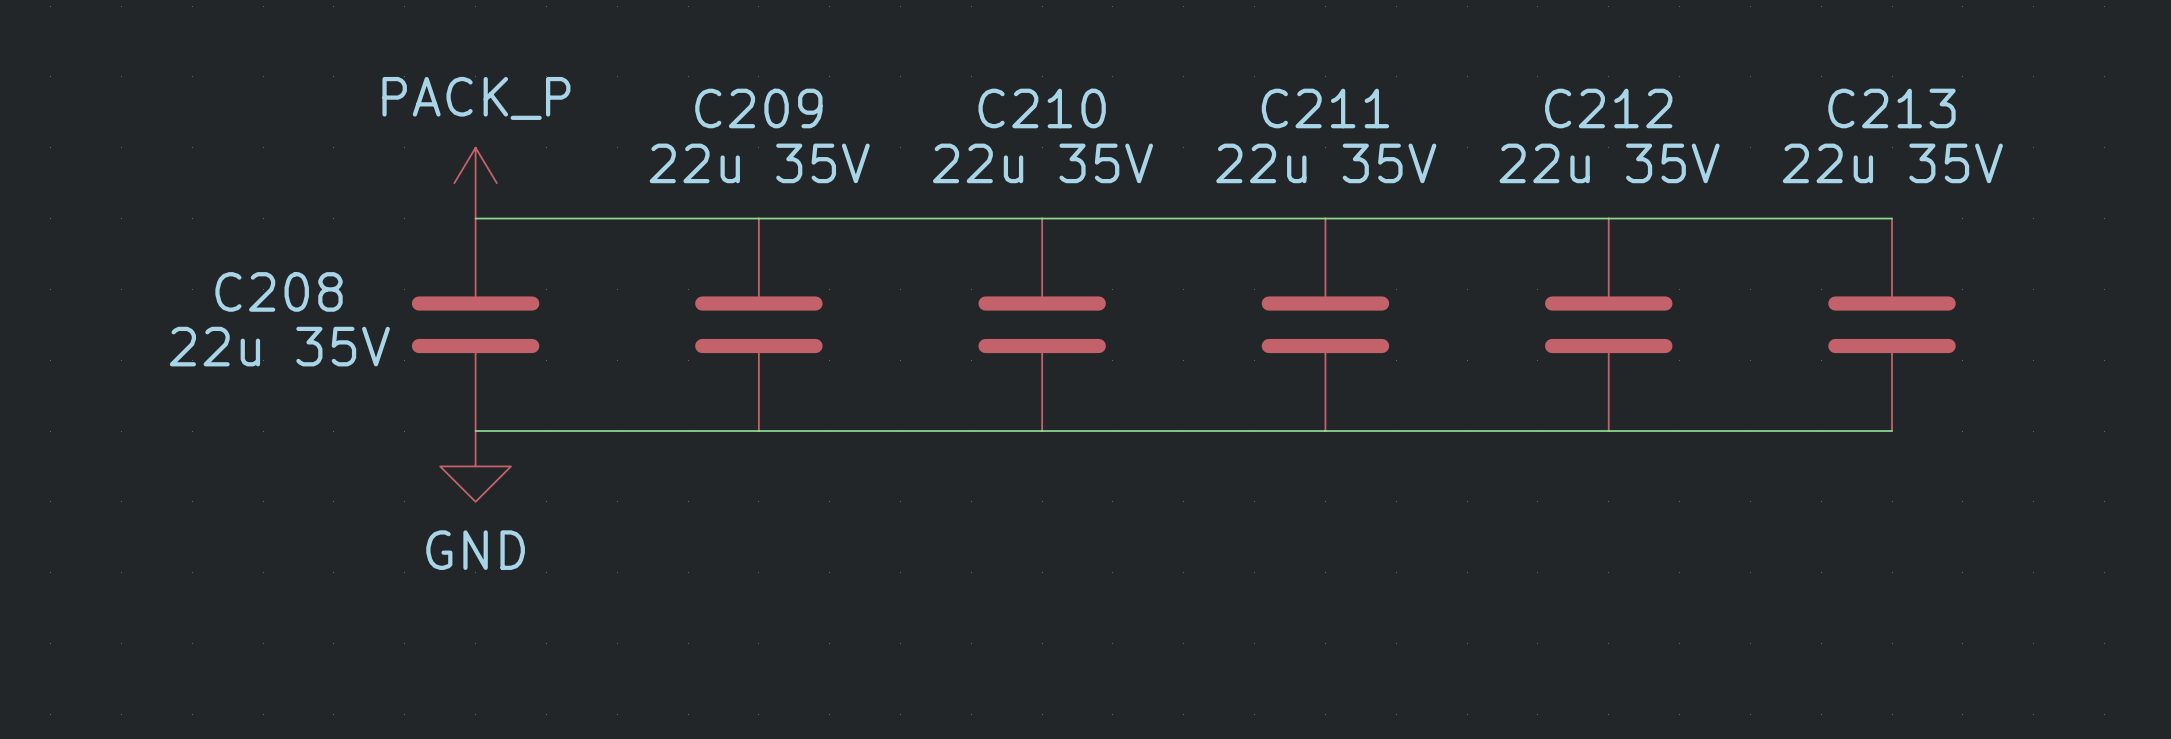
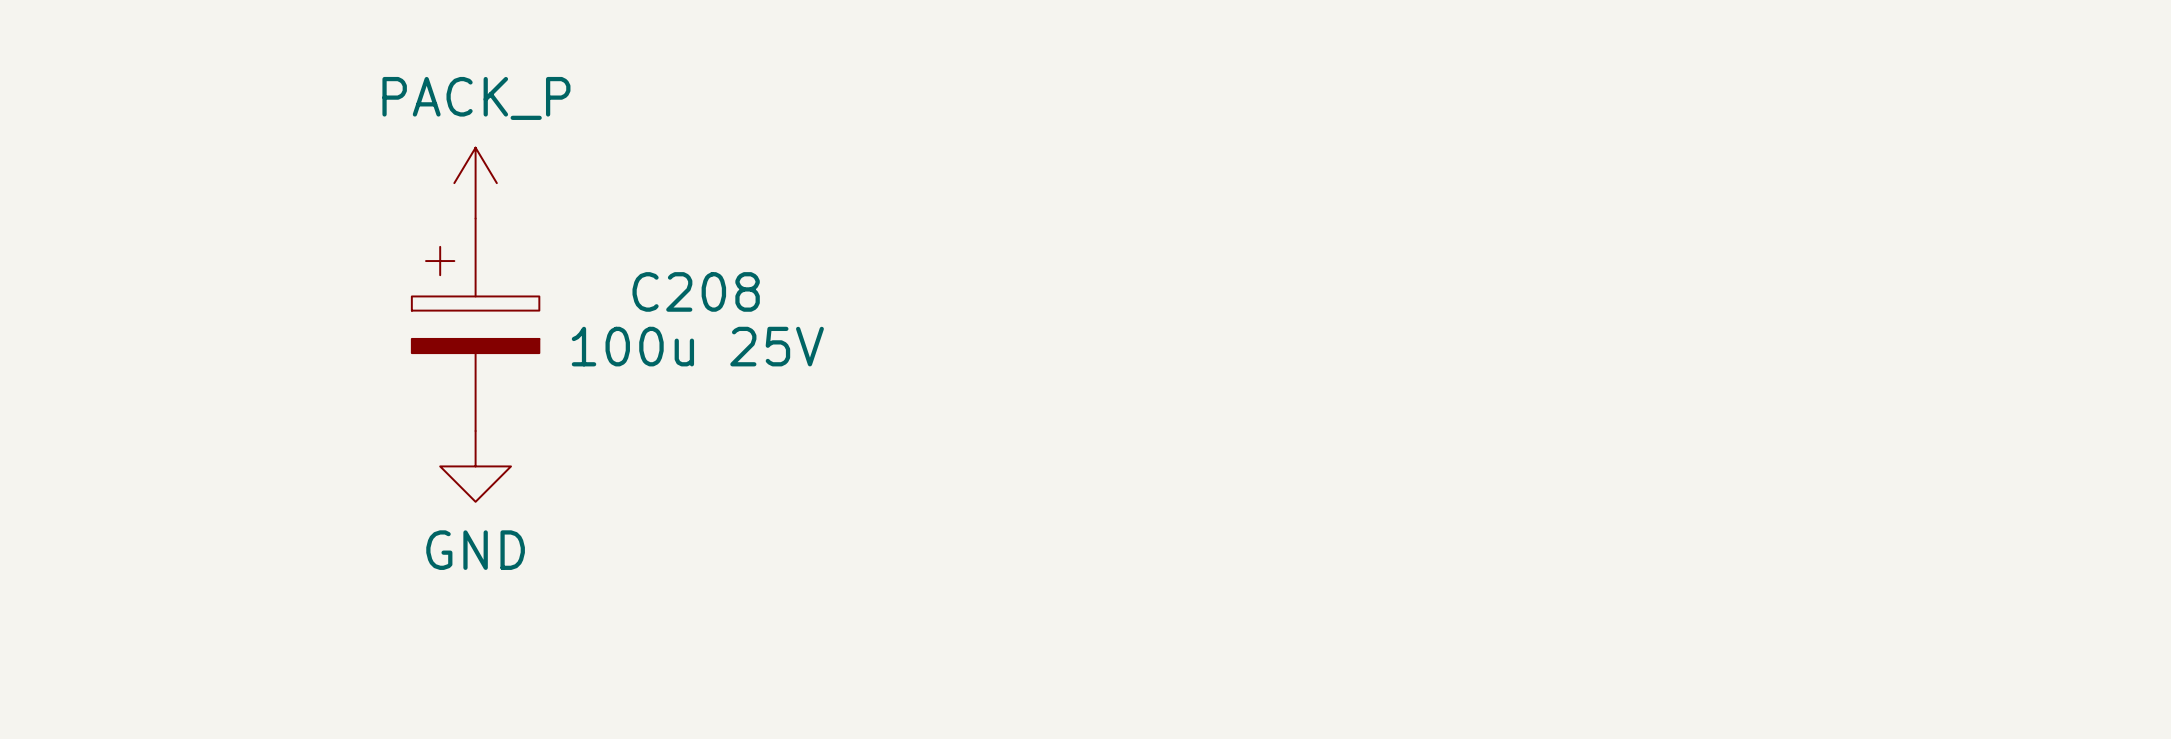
C208 symbol: [411, 218, 540, 432] -> [411, 218, 540, 432]
wire: (475, 218) (1892, 218) -> none
C208 name position: C208 (279, 291) -> C208 (696, 291)
C209: 22u 35V (758, 324) -> none
C210: 22u 35V (1042, 324) -> none
C211: 22u 35V (1325, 324) -> none
C212: 22u 35V (1608, 324) -> none
C213: 22u 35V (1892, 324) -> none
C208 value: 22u 35V (279, 346) -> 100u 25V (697, 346)
wire: (475, 431) (1892, 431) -> none

